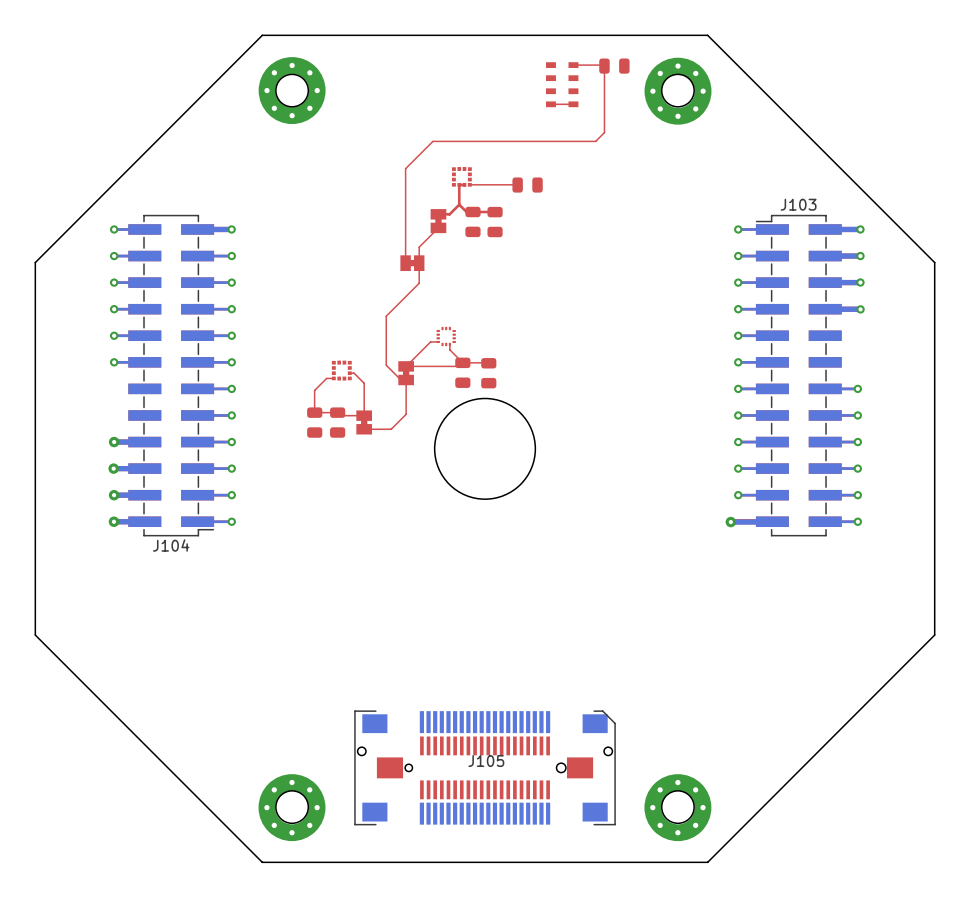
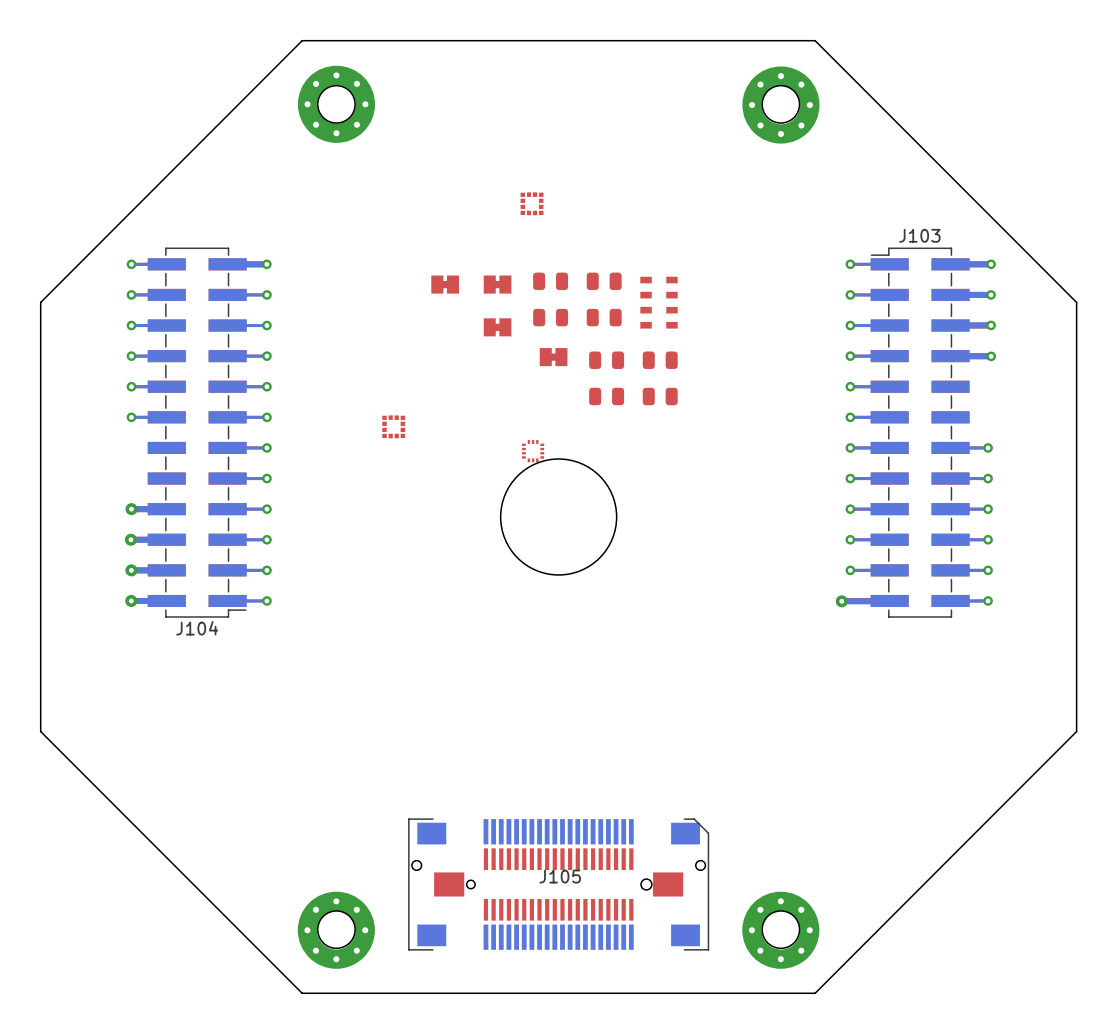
top track: (573, 65) (604, 66) (604, 132) (595, 141) (432, 141) (405, 168) (405, 263) -> none
part: (614, 66) -> none
part position: (562, 84) -> (659, 302)
top track: (573, 104) (550, 104) -> none
top track: (464, 184) (459, 184) (459, 204) -> none
top track: (469, 184) (517, 185) -> none
part: (527, 185) -> none
top track: (459, 204) (466, 212) (494, 212) -> none
top track: (459, 204) (449, 214) (438, 214) -> none
part: (438, 221) -> none
part: (472, 221) -> none
part: (495, 222) -> none
top track: (438, 227) (419, 247) (419, 283) (386, 316) (386, 365) (401, 380) (406, 380) (406, 414) (391, 429) (364, 429) -> none
part: none -> (550, 281)
part: none -> (604, 281)
part: none -> (445, 284)
part: none -> (497, 284)
part: (412, 263) -> none
part: none -> (550, 317)
part: none -> (604, 317)
part: none -> (497, 327)
part: none -> (553, 357)
part: none -> (606, 360)
part: none -> (660, 360)
part position: (446, 336) -> (533, 451)
top track: (438, 341) (430, 341) (406, 366) (459, 366) (462, 362) -> none
top track: (449, 344) (449, 349) (462, 362) -> none
part: none -> (606, 396)
part: none -> (660, 396)
top track: (462, 362) (488, 363) -> none
part: (462, 372) -> none
top track: (349, 373) (354, 373) (364, 383) (364, 415) (314, 412) -> none
part: (406, 373) -> none
part: (488, 373) -> none
top track: (333, 378) (326, 378) (314, 390) (314, 412) -> none
part: (314, 422) -> none
part: (337, 422) -> none
part: (364, 422) -> none

